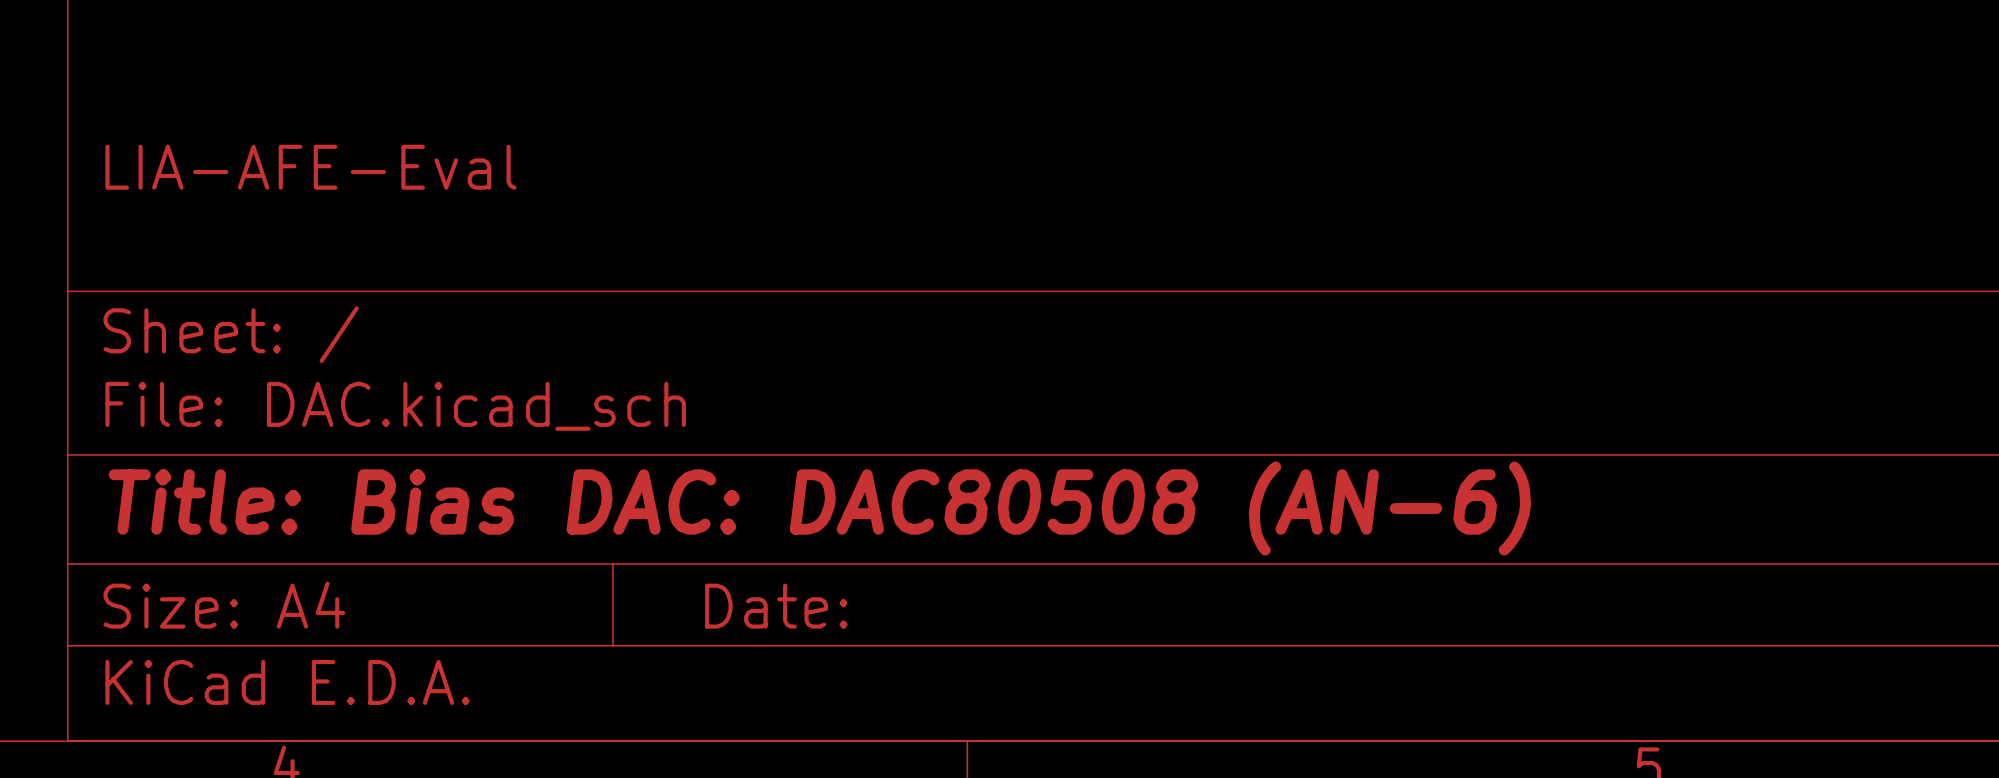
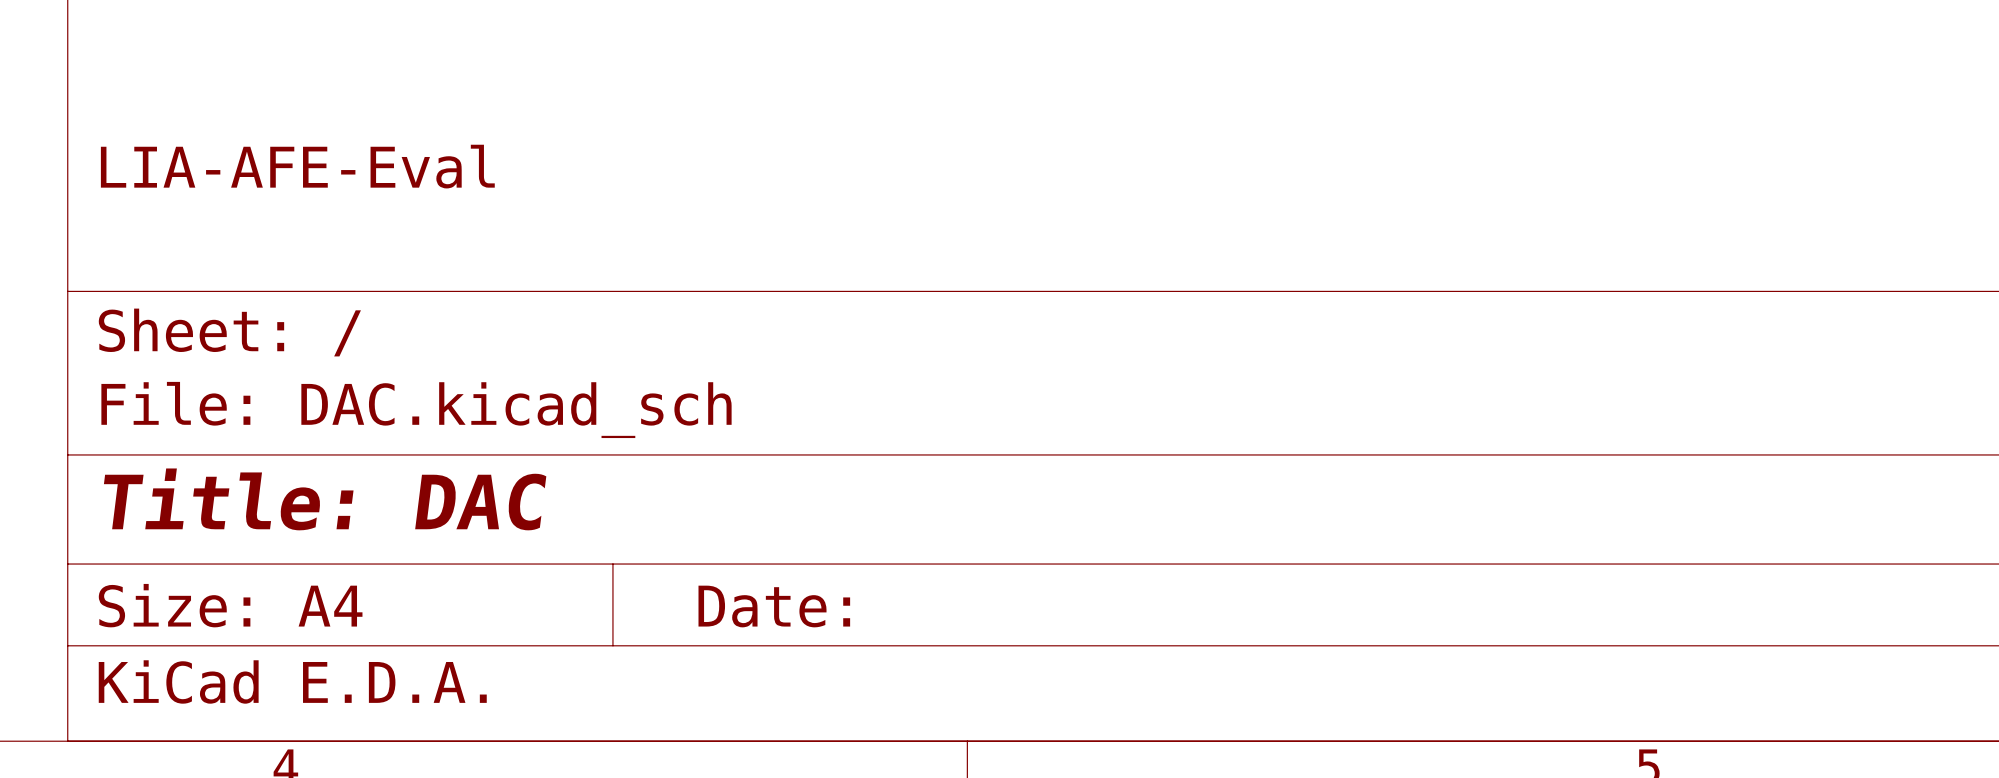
title block: Title: Bias DAC: DAC80508 (AN-6) (819, 508) -> Title: DAC (325, 499)

